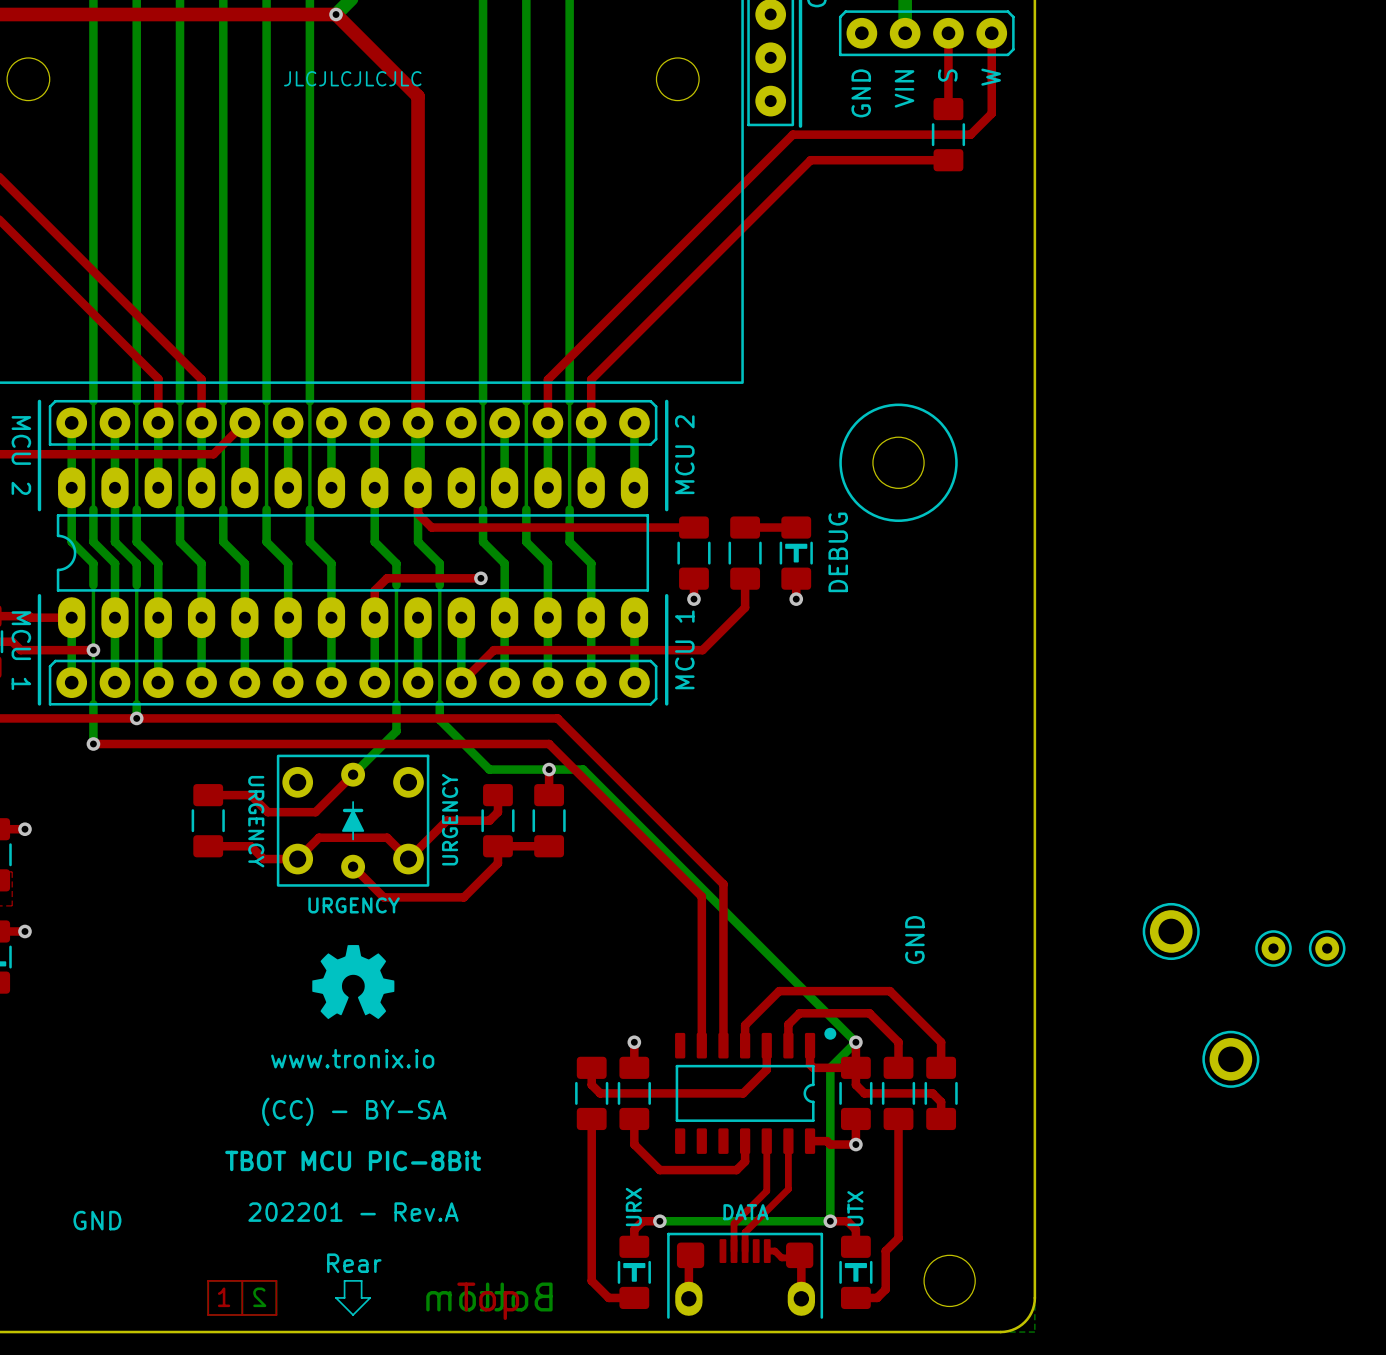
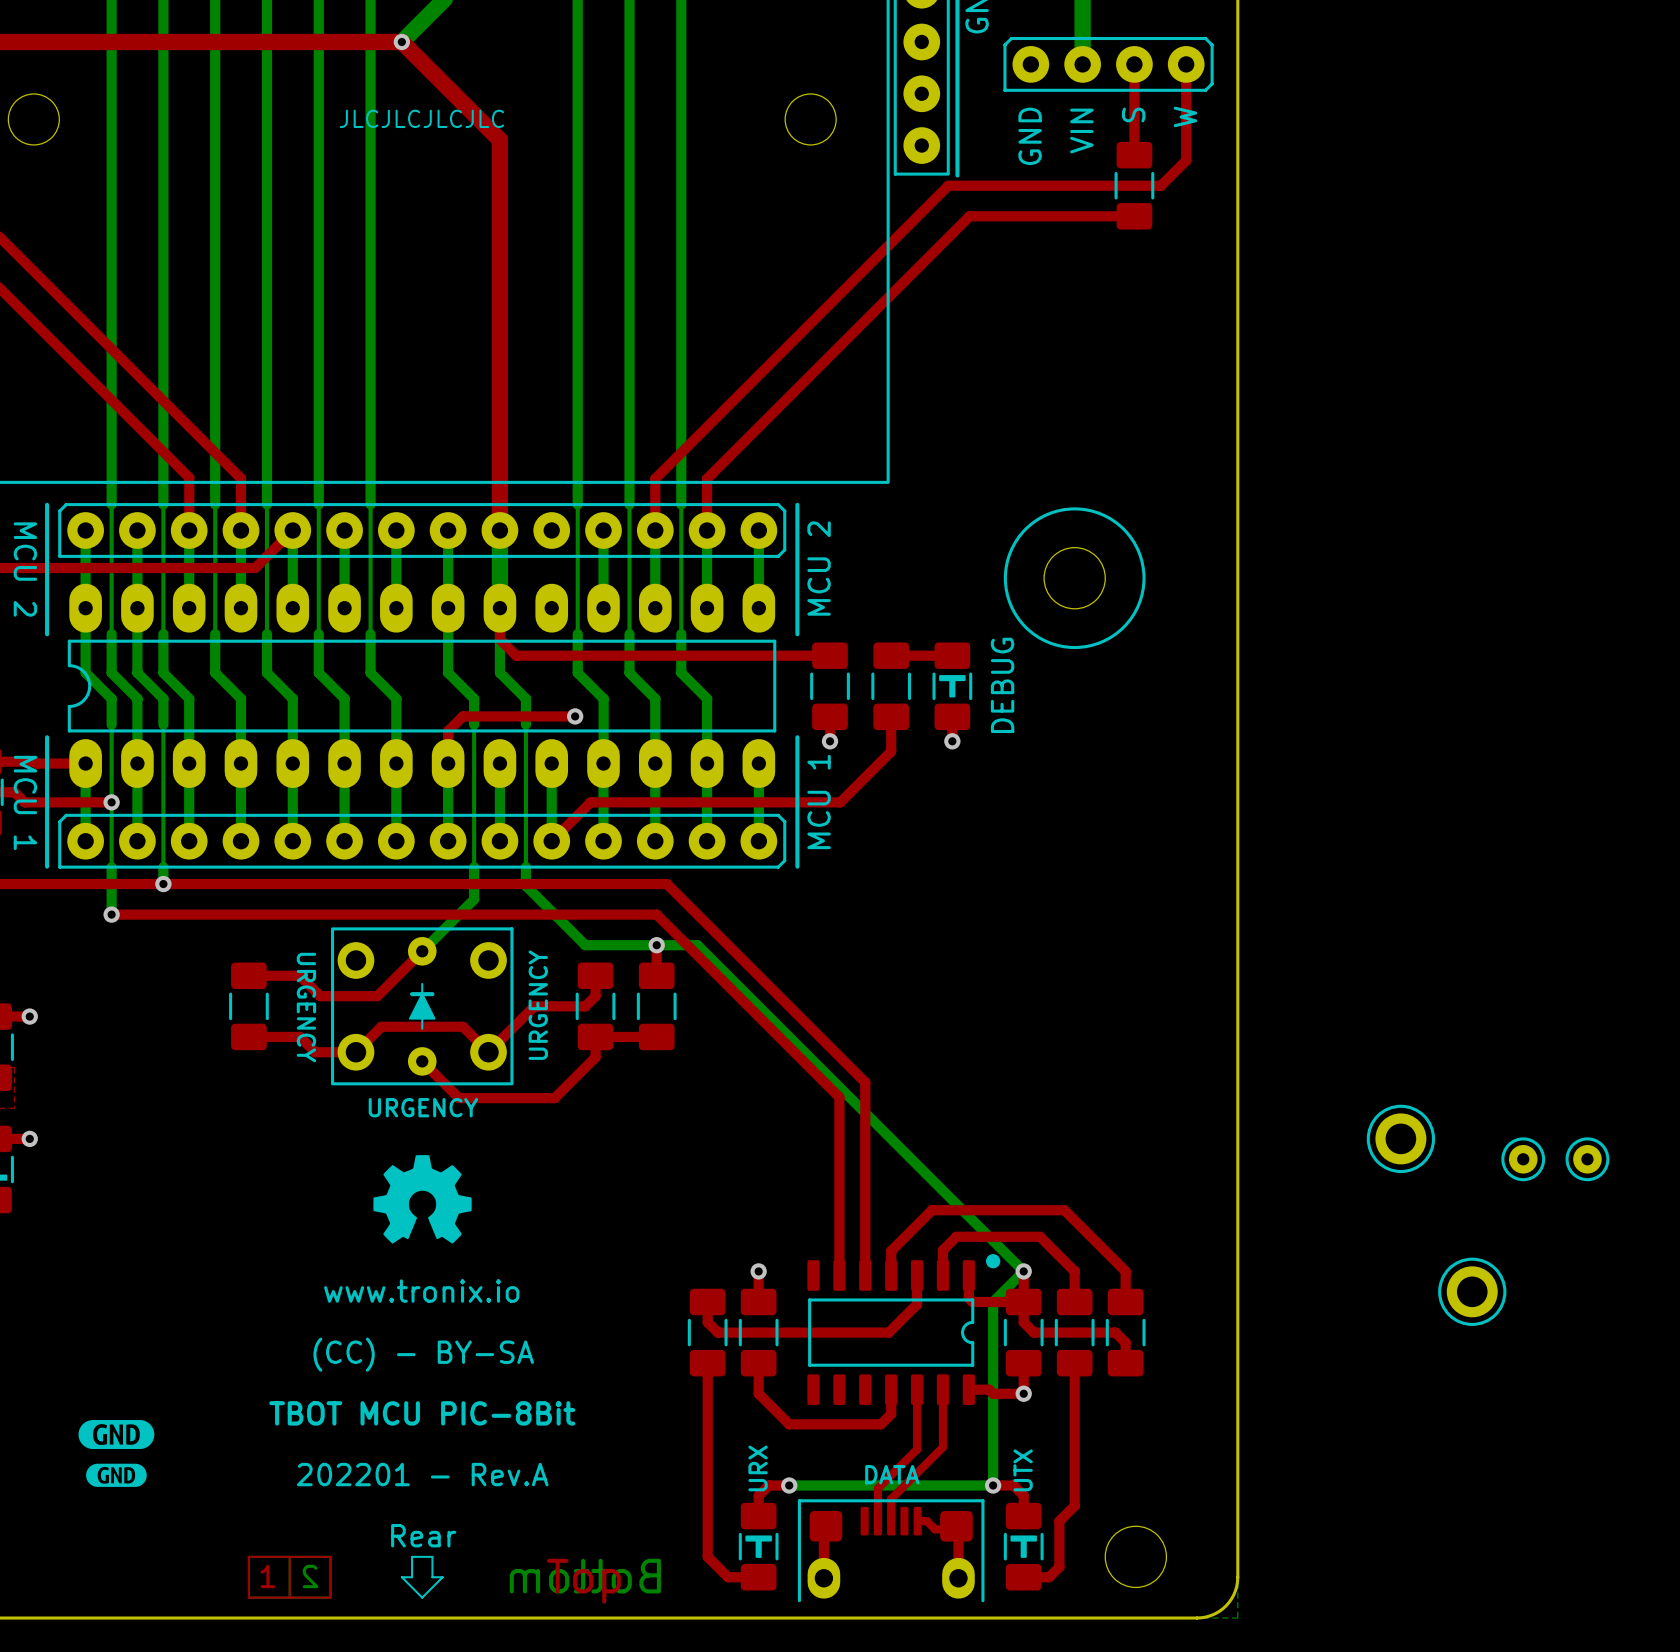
text: GND (914, 940) -> none
drawing: none -> [78, 1420, 155, 1487]
text: GND (97, 1220) -> none

